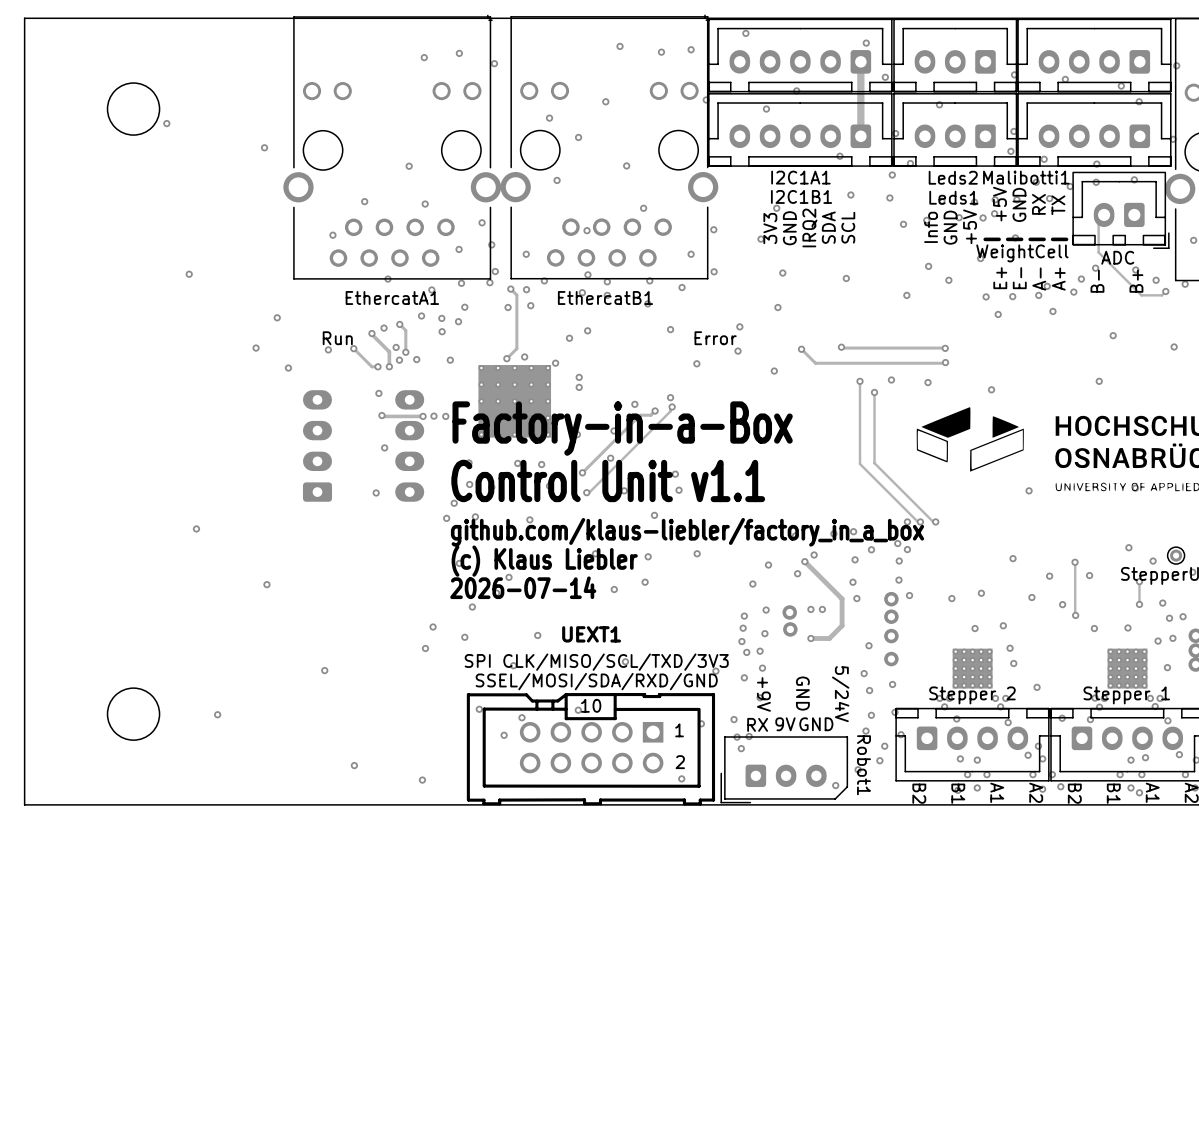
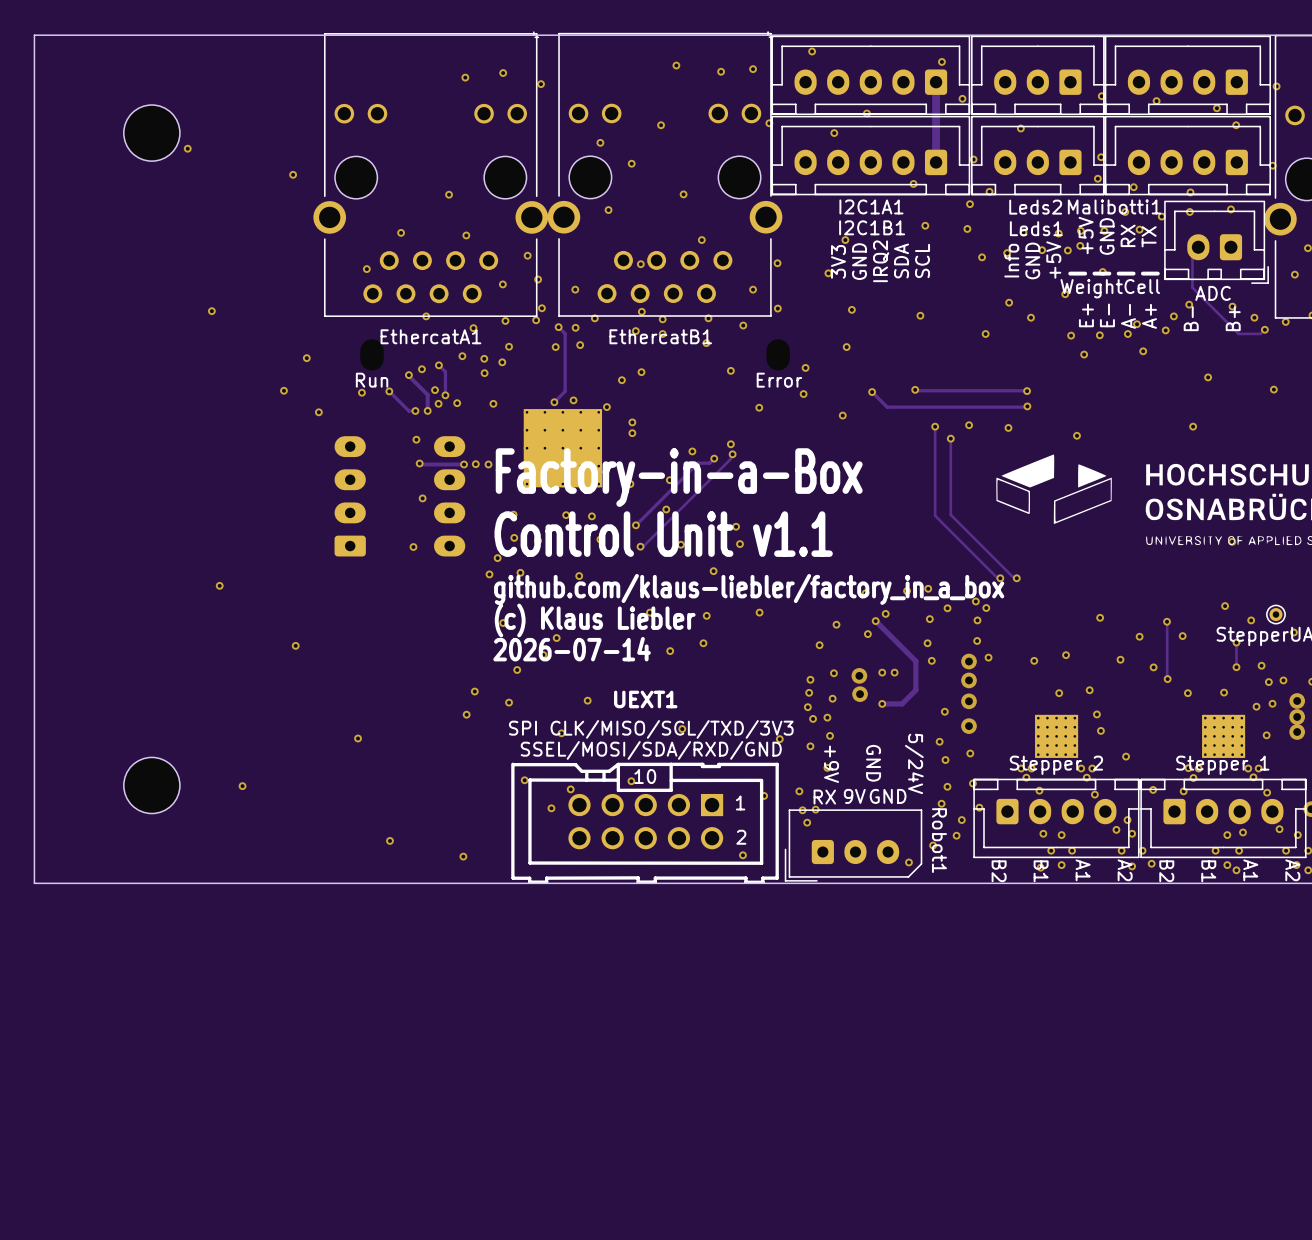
via: (1029, 490) -> none
via: (907, 521) -> none

